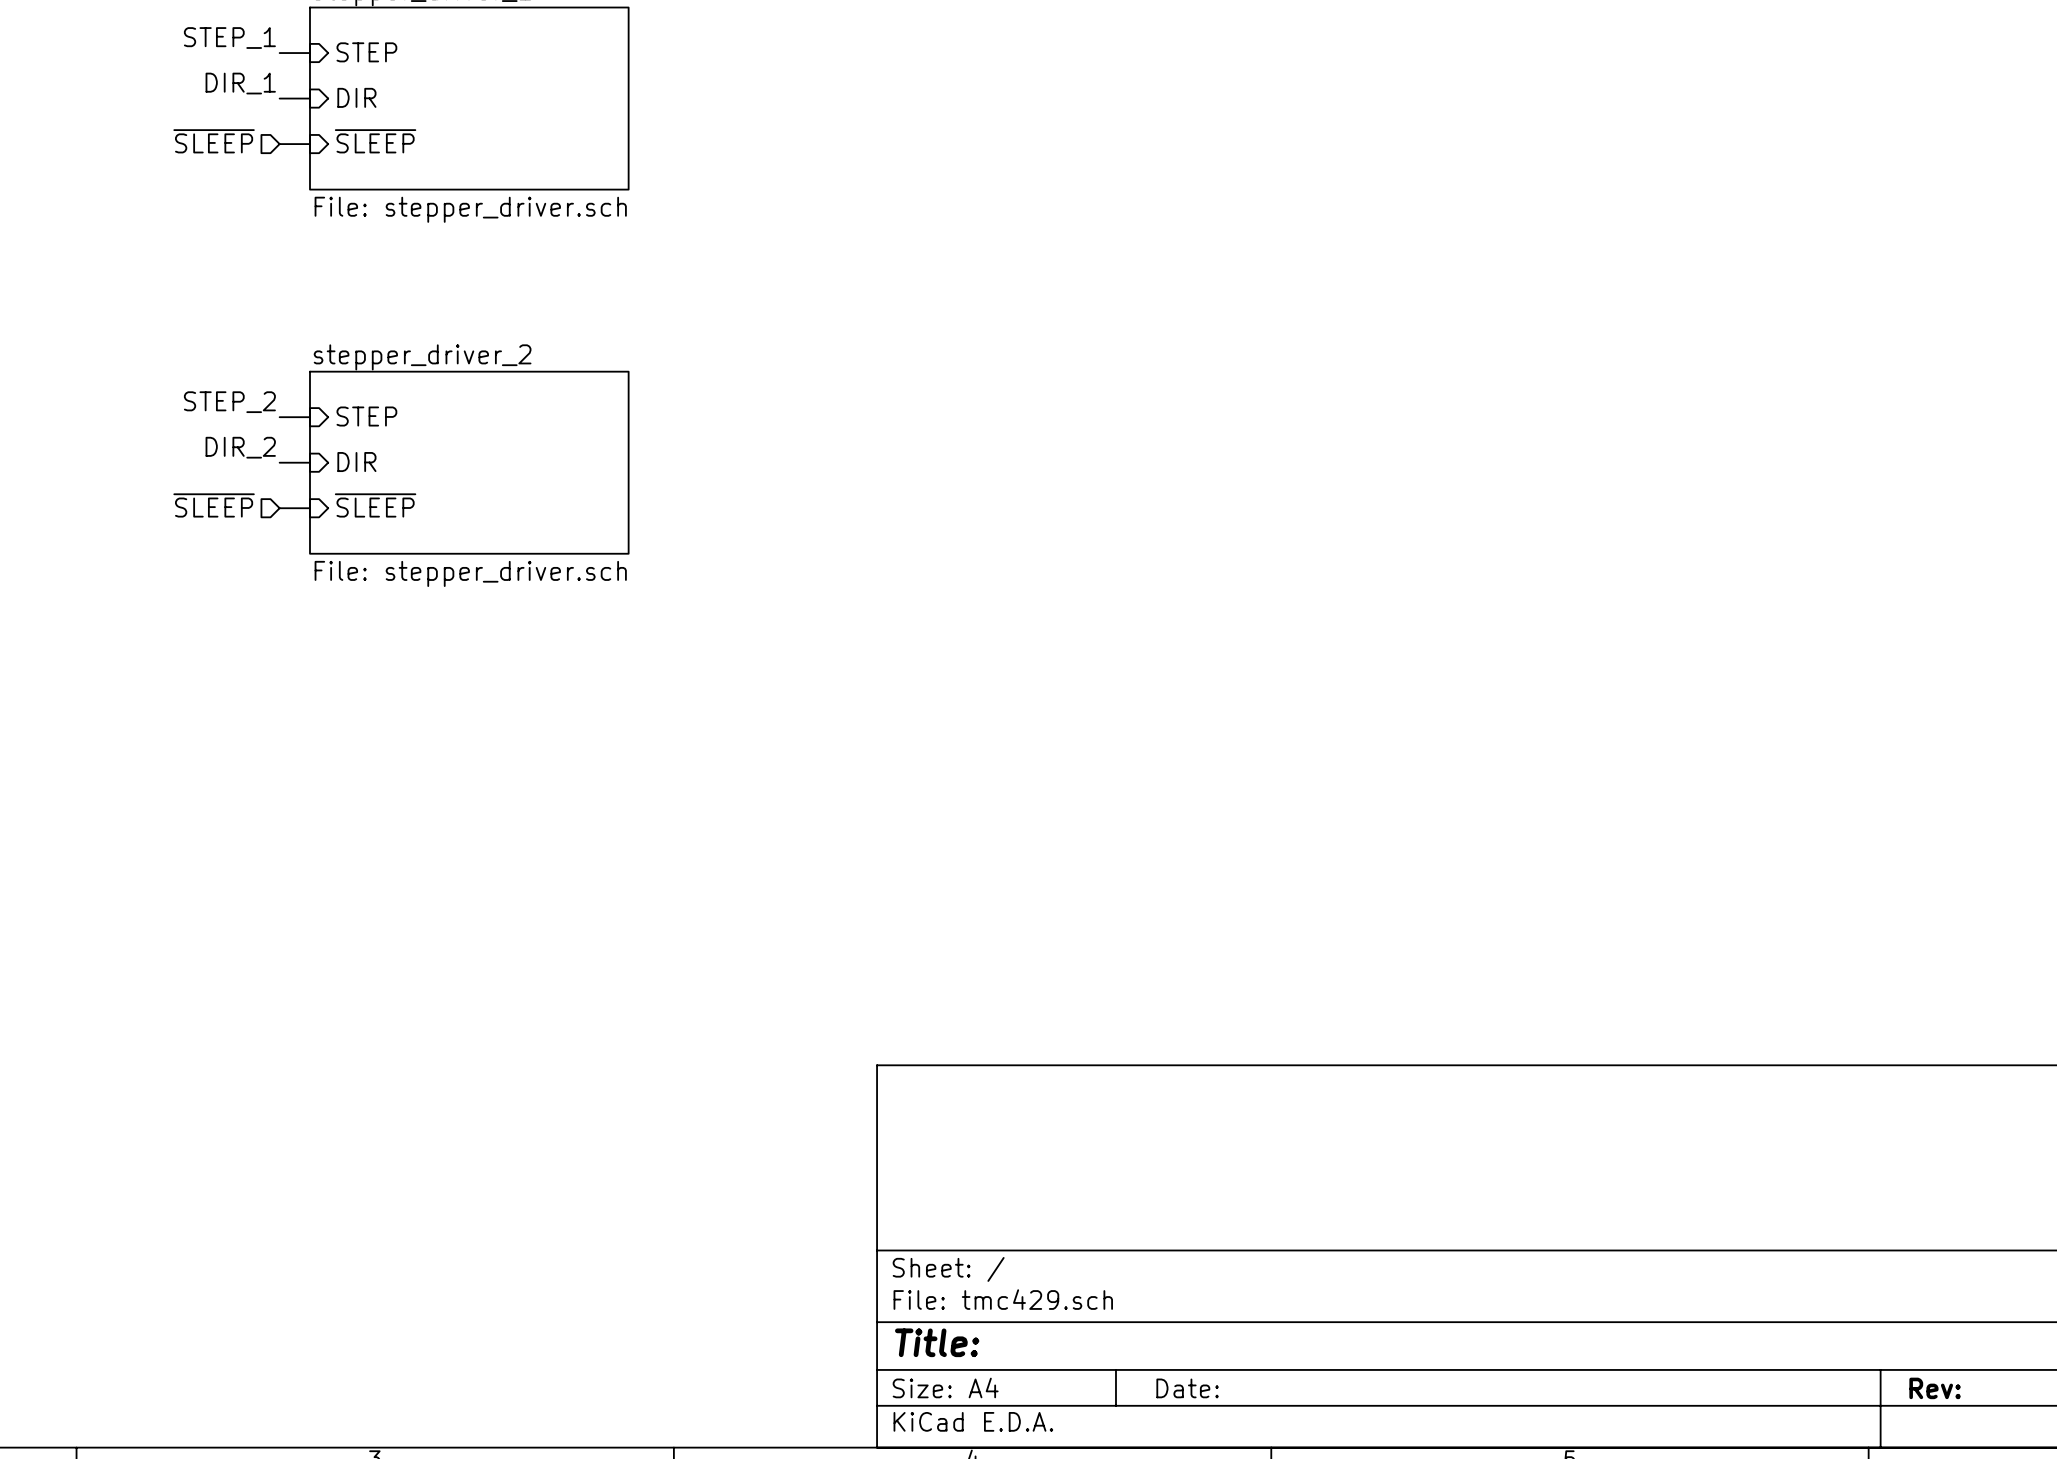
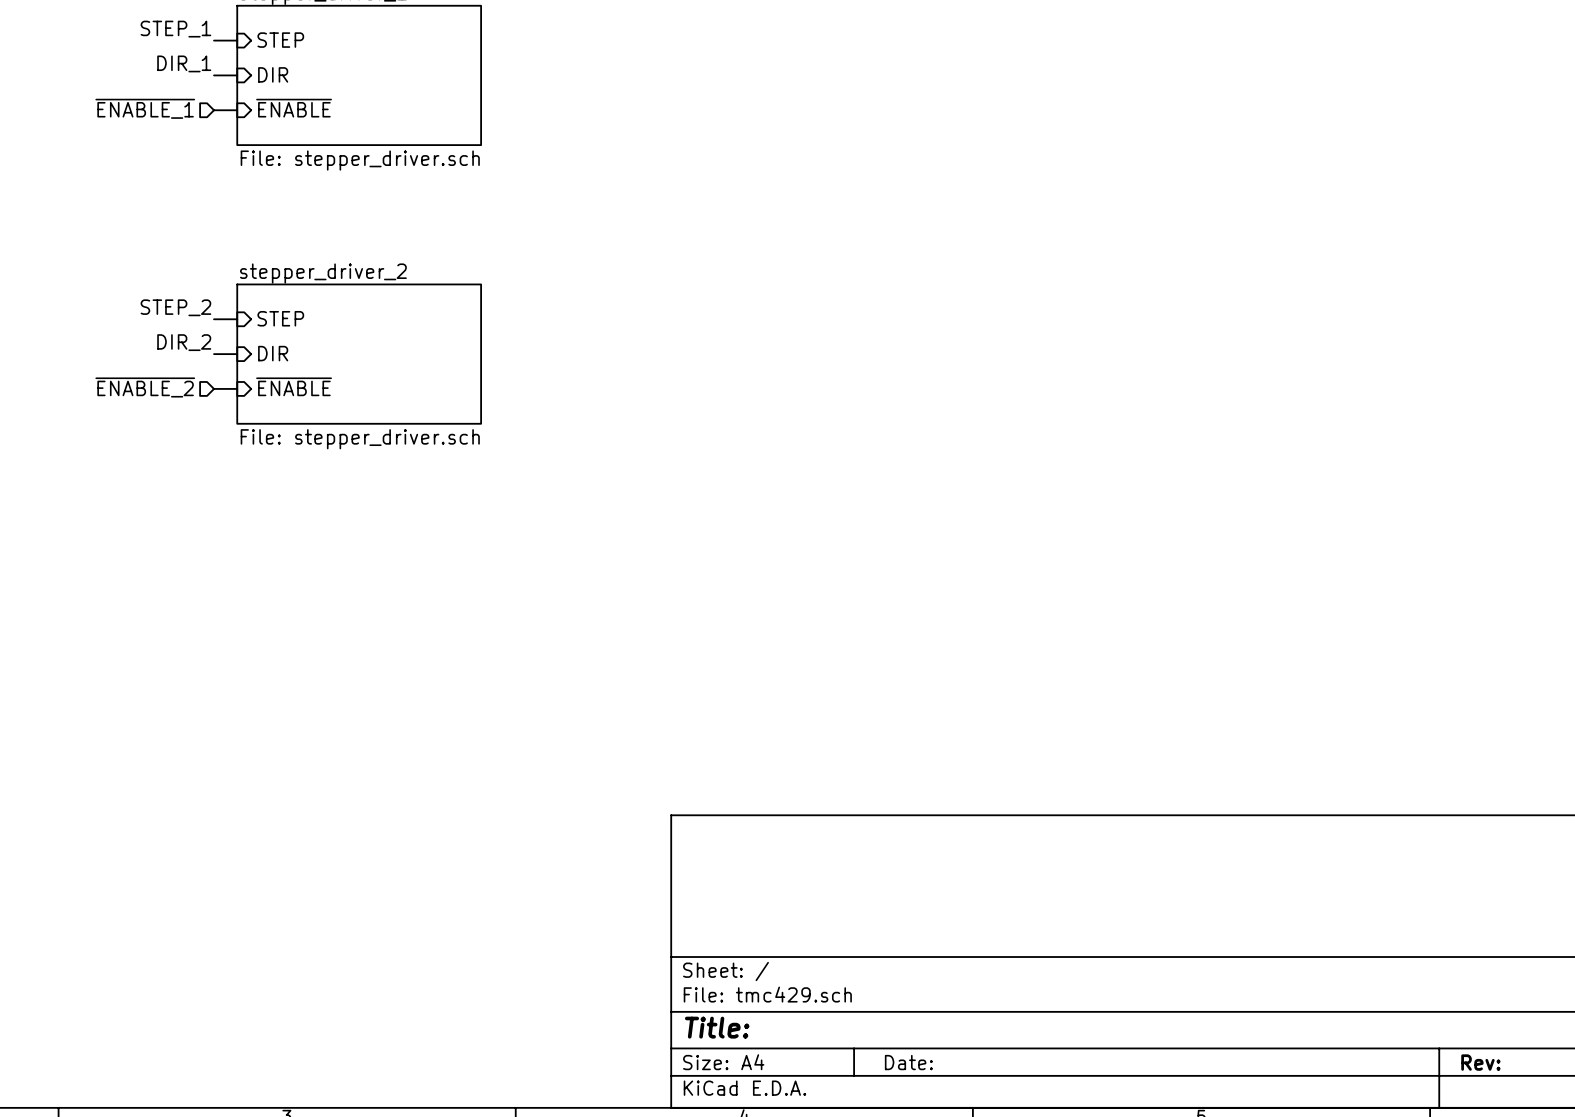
hierarchical label: ~{SLEEP} (214, 141) -> ~{ENABLE_1} (145, 108)
sheet pin: ~{SLEEP} (375, 141) -> ~{ENABLE} (294, 108)
hierarchical label: ~{SLEEP} (214, 505) -> ~{ENABLE_2} (145, 387)
sheet pin: ~{SLEEP} (375, 505) -> ~{ENABLE} (294, 386)

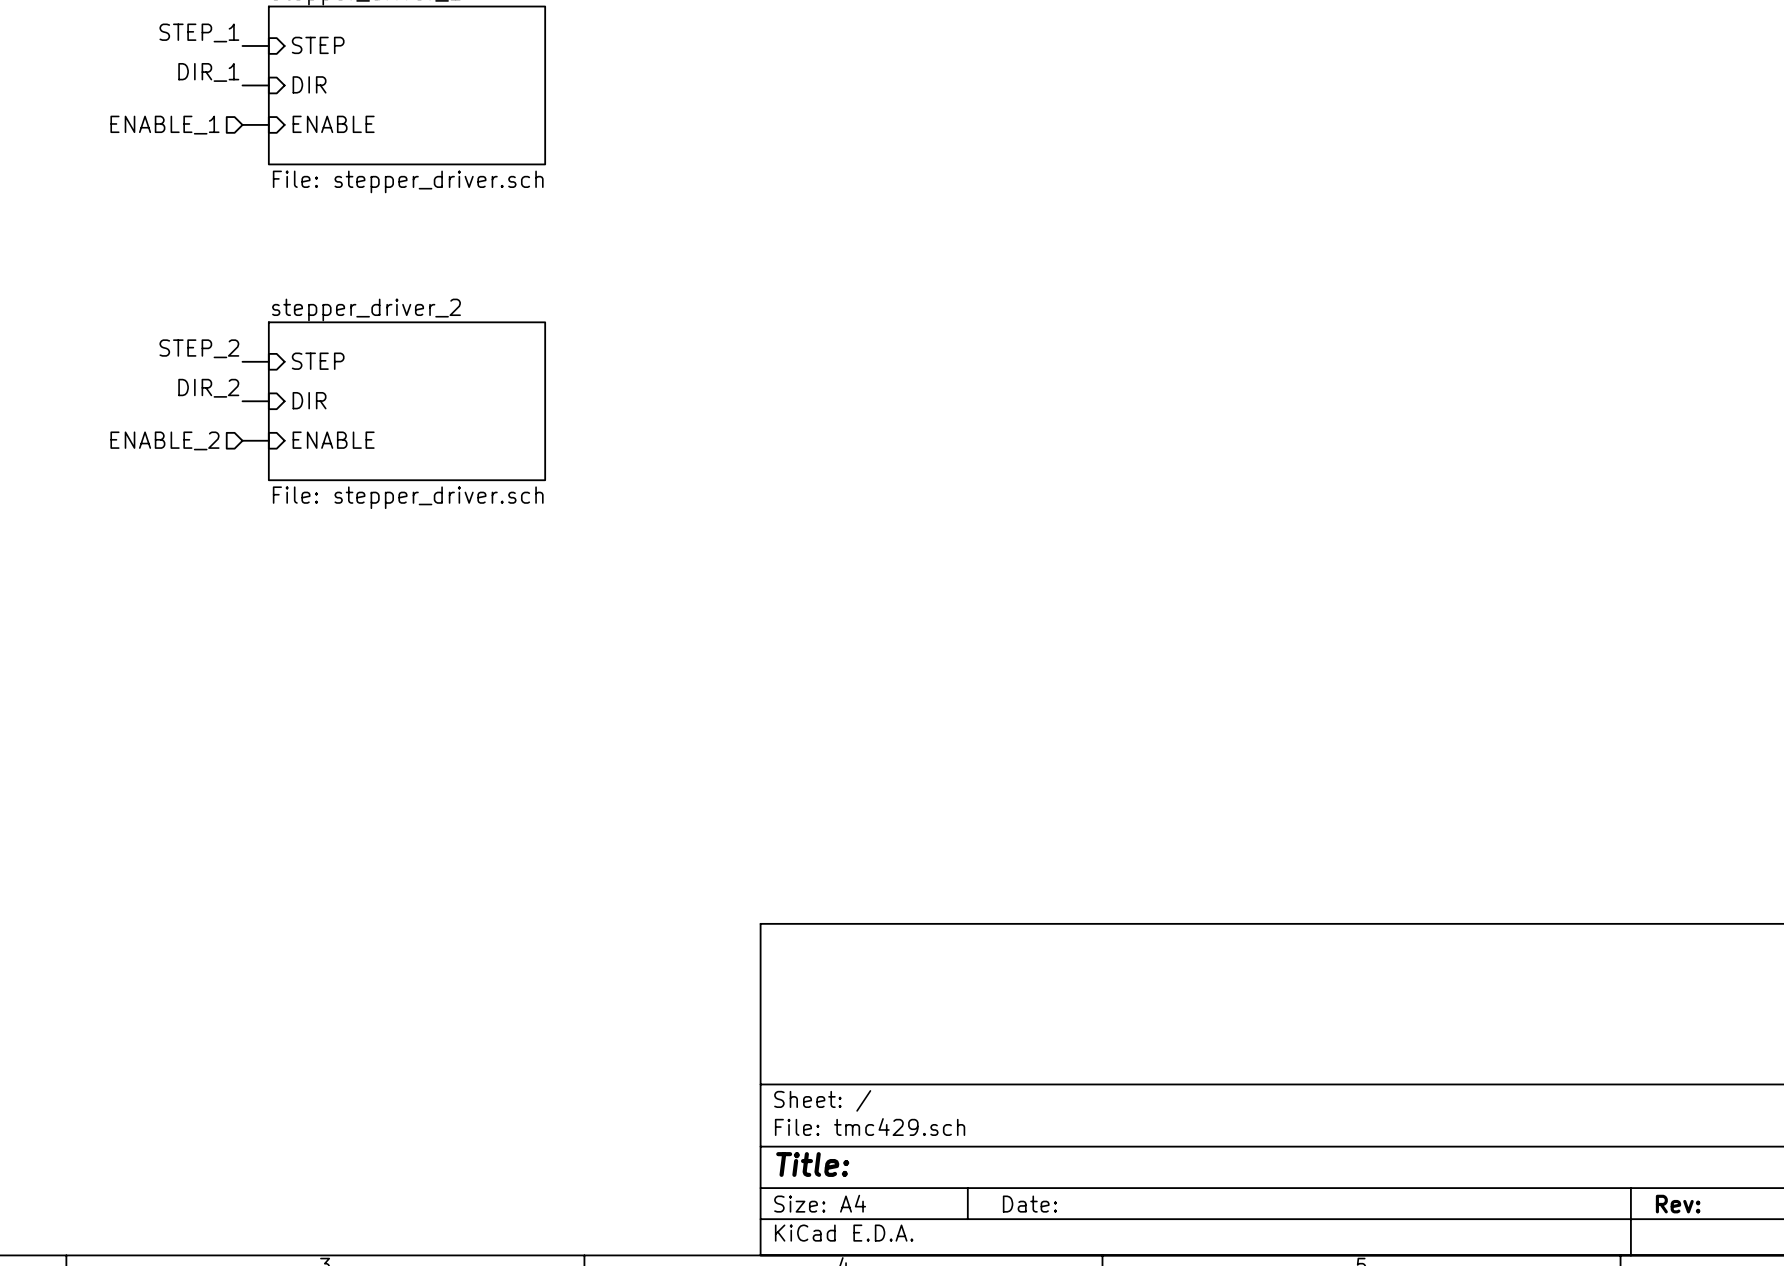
hierarchical label: ~{ENABLE_1} (145, 108) -> ENABLE_1 (164, 125)
sheet pin: ~{ENABLE} (294, 108) -> ENABLE (333, 124)
sheet pin: ~{ENABLE} (294, 386) -> ENABLE (333, 440)
hierarchical label: ~{ENABLE_2} (145, 387) -> ENABLE_2 (164, 440)

